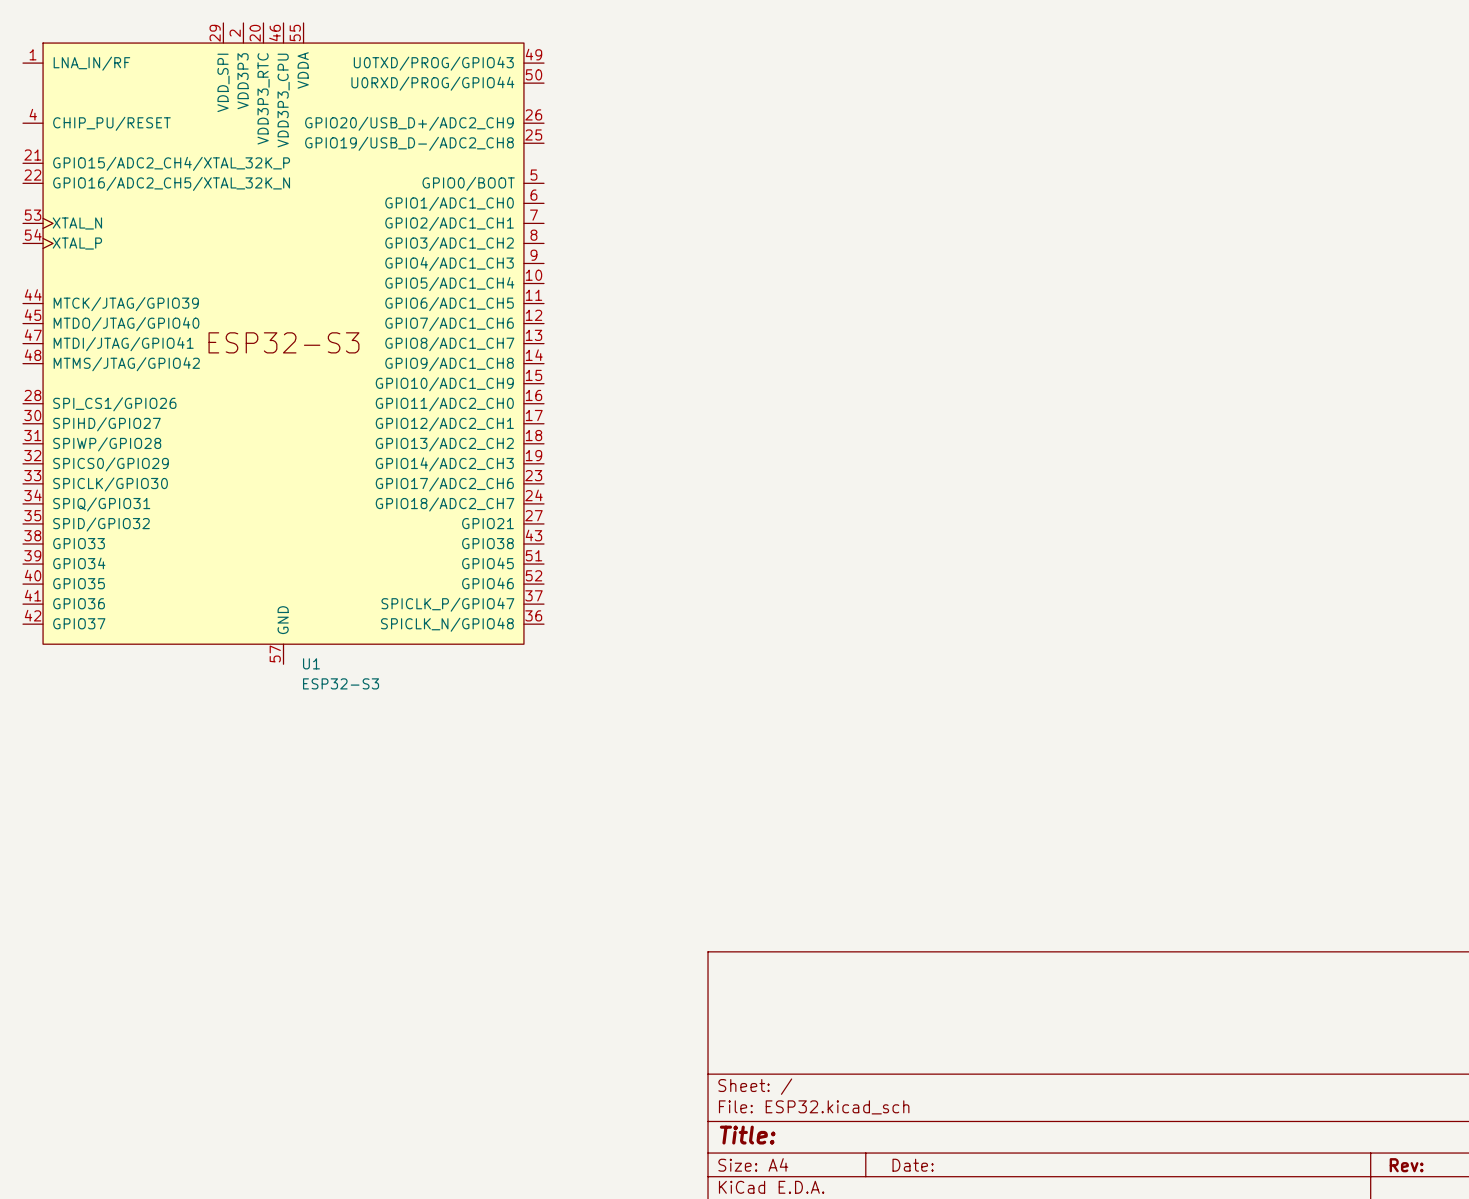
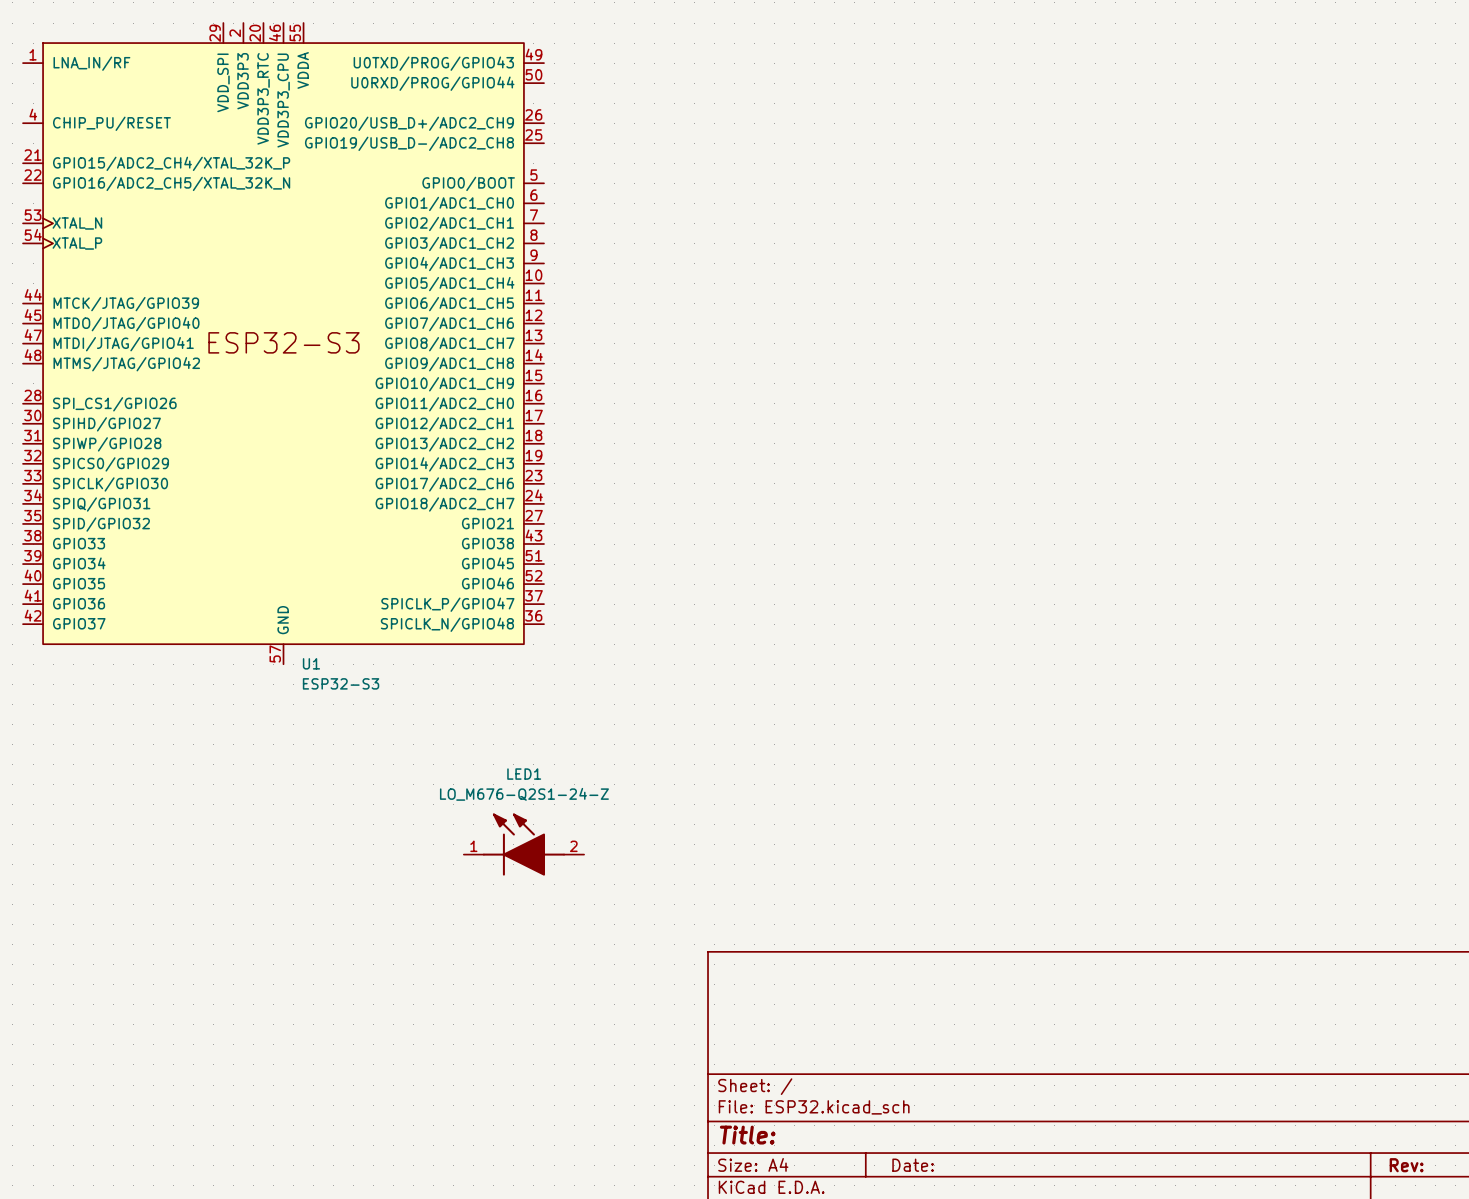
LED1: none -> LO_M676-Q2S1-24-Z (523, 844)

